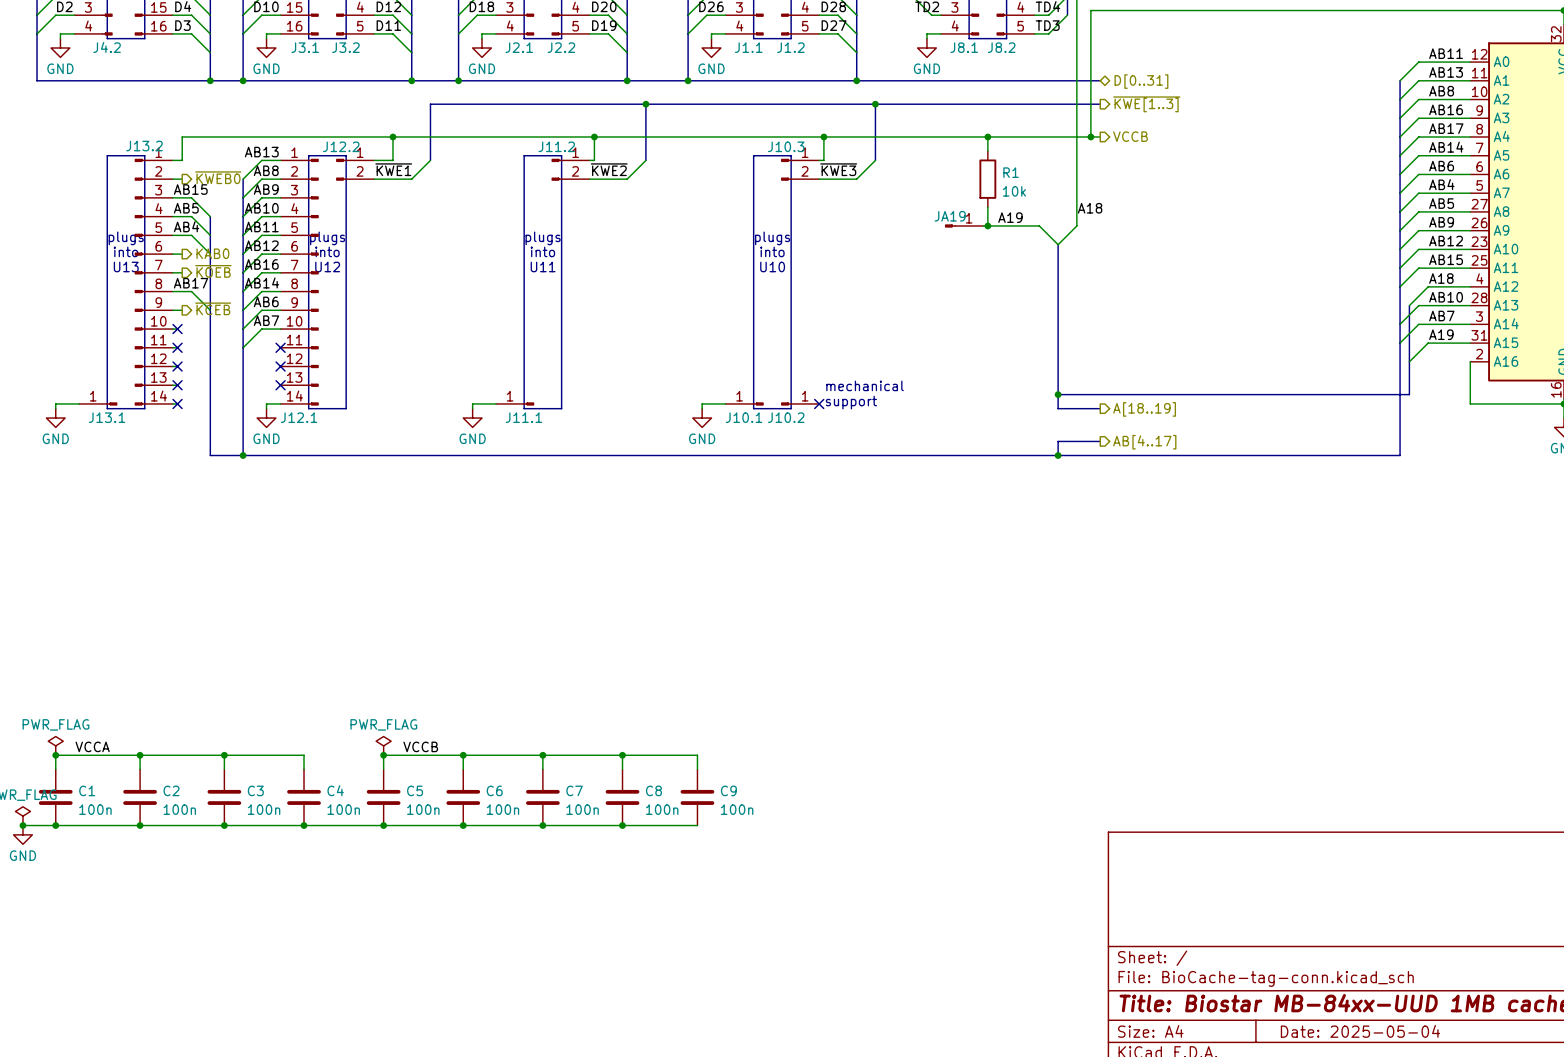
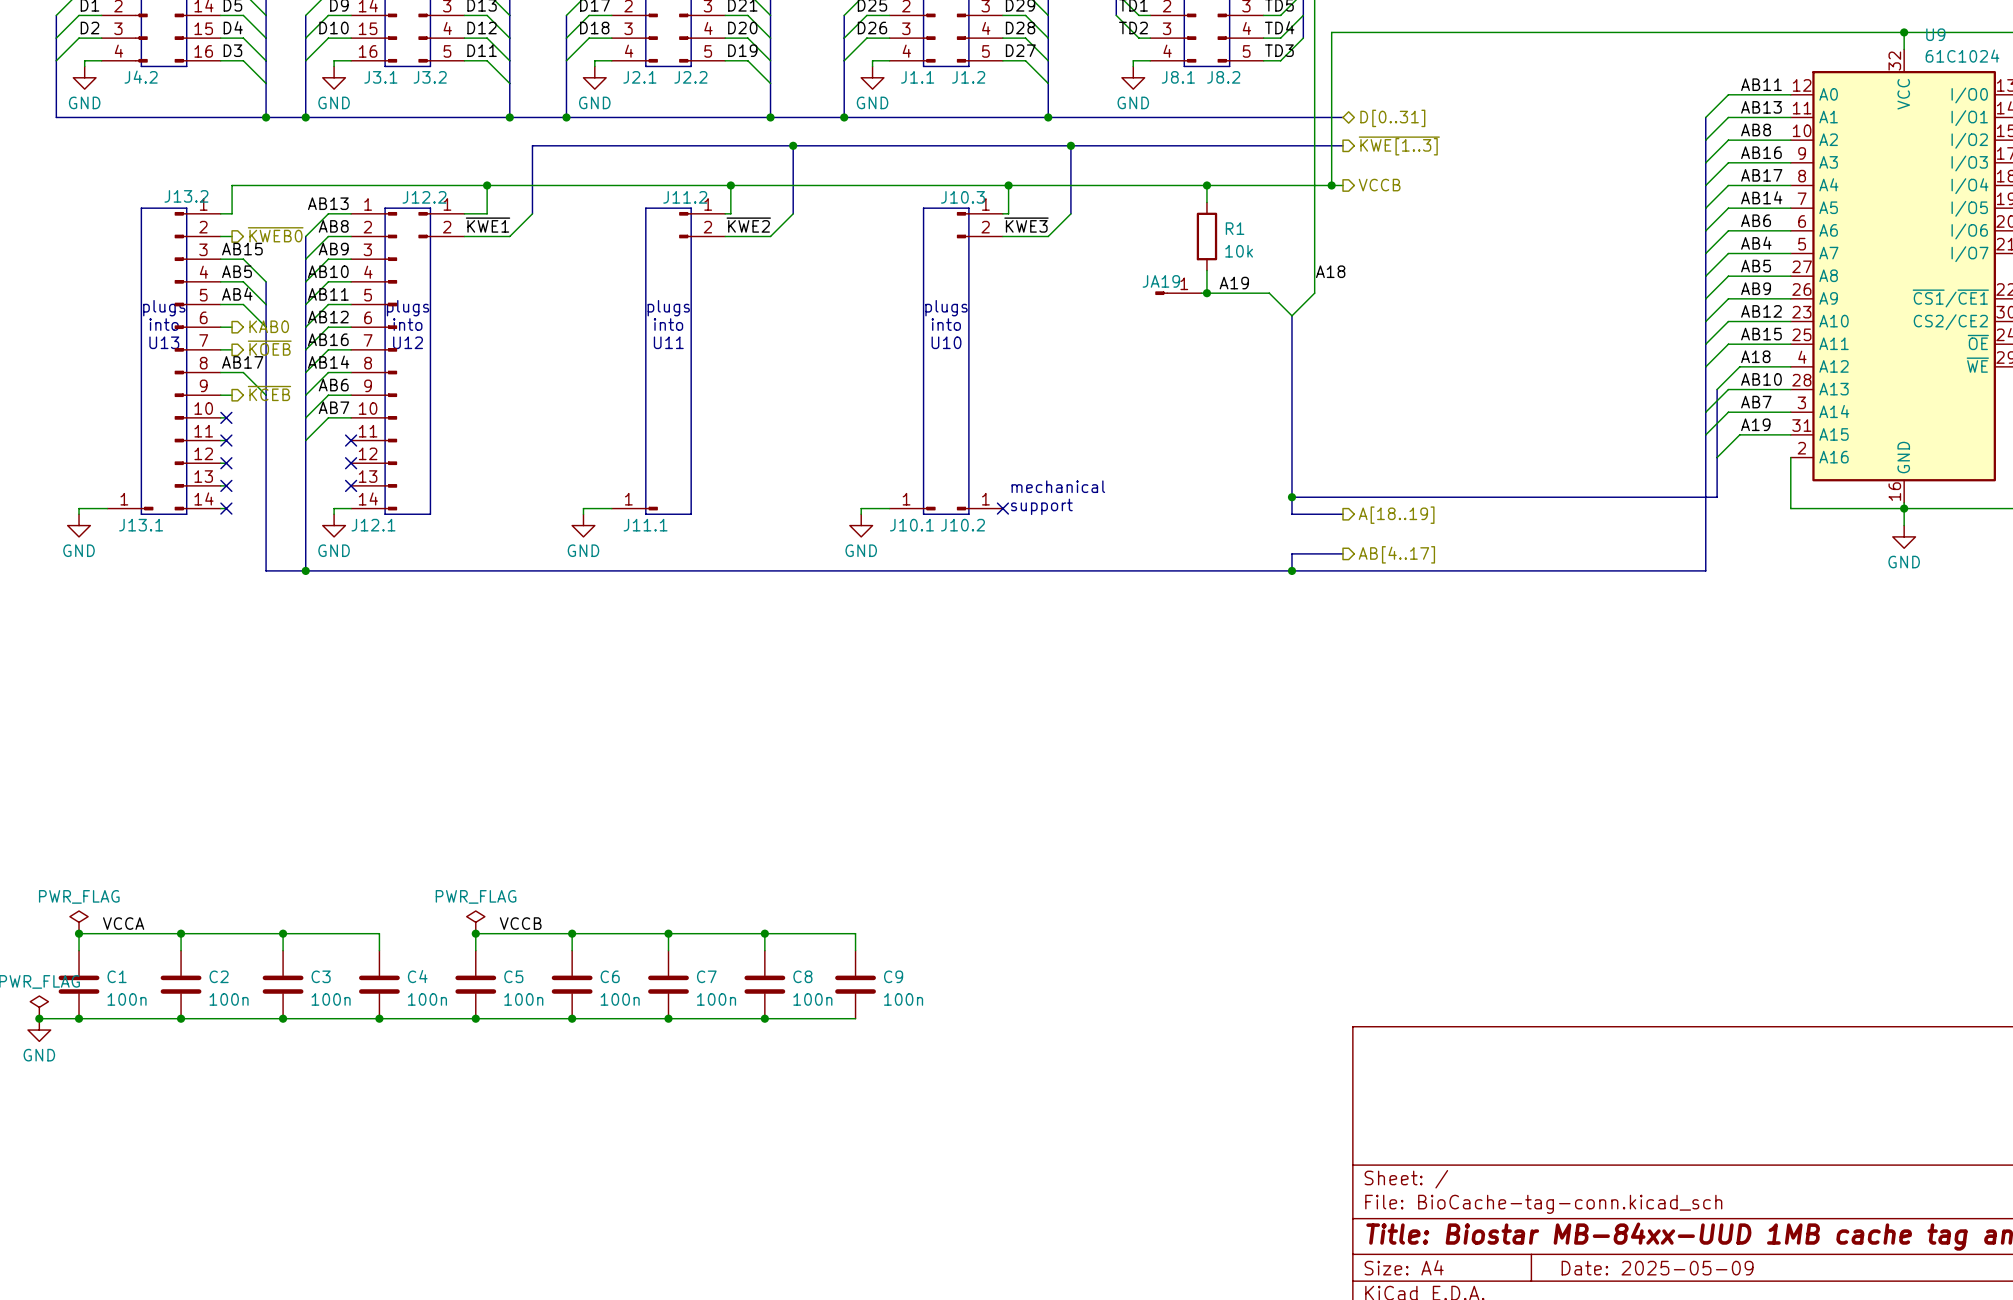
title block: Date: 2025-05-04 (1360, 1031) -> Date: 2025-05-09 (1657, 1268)

